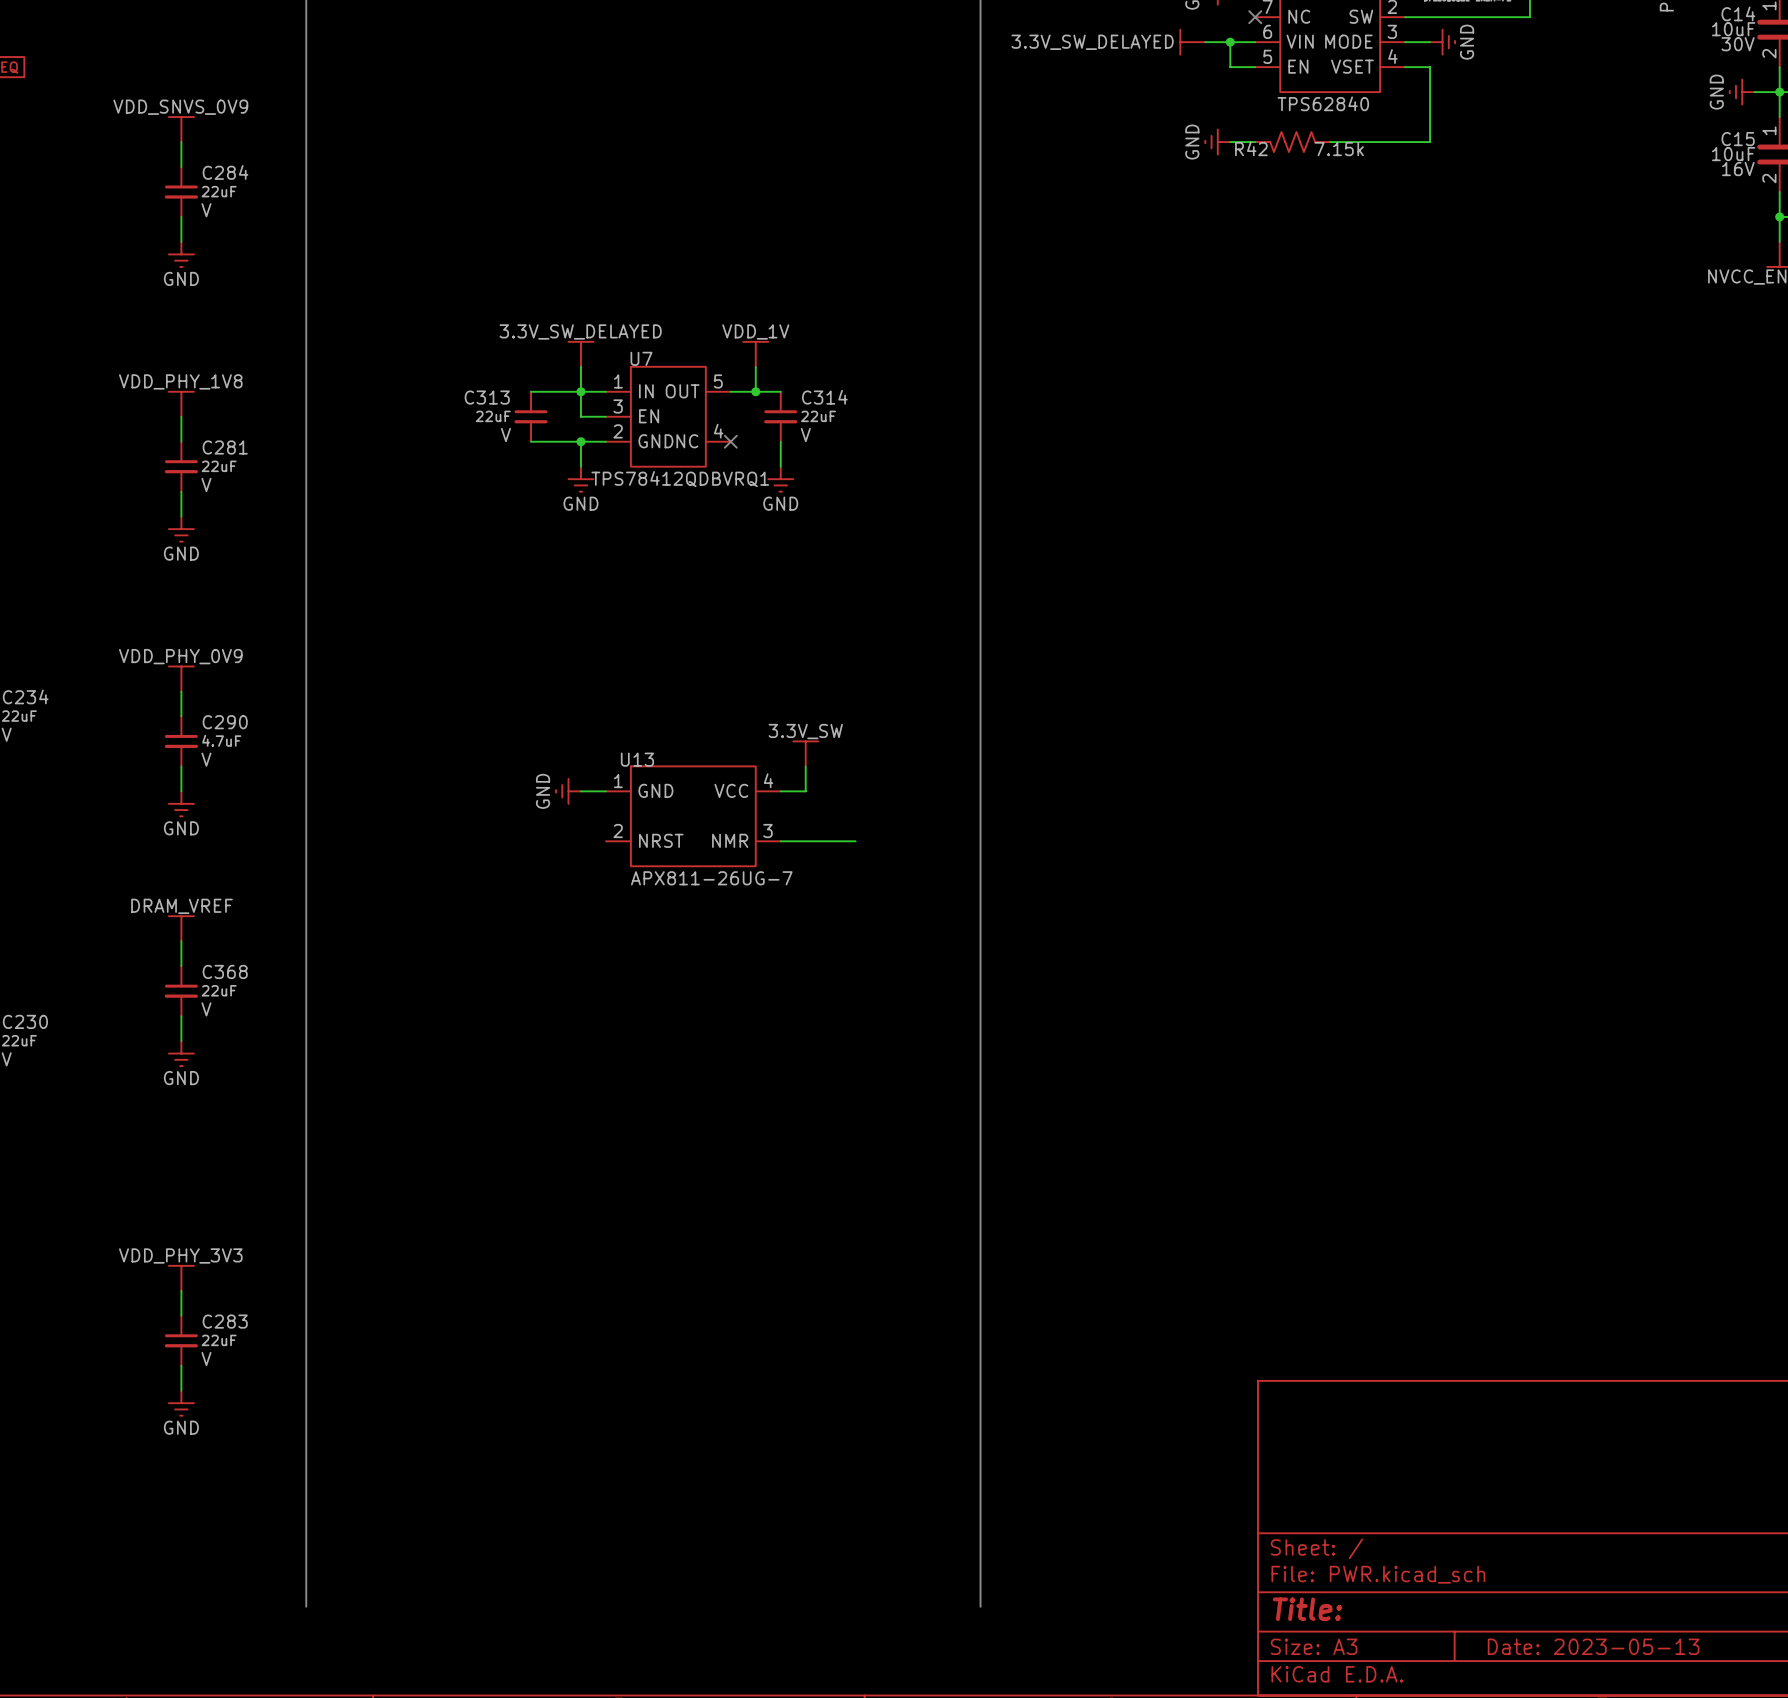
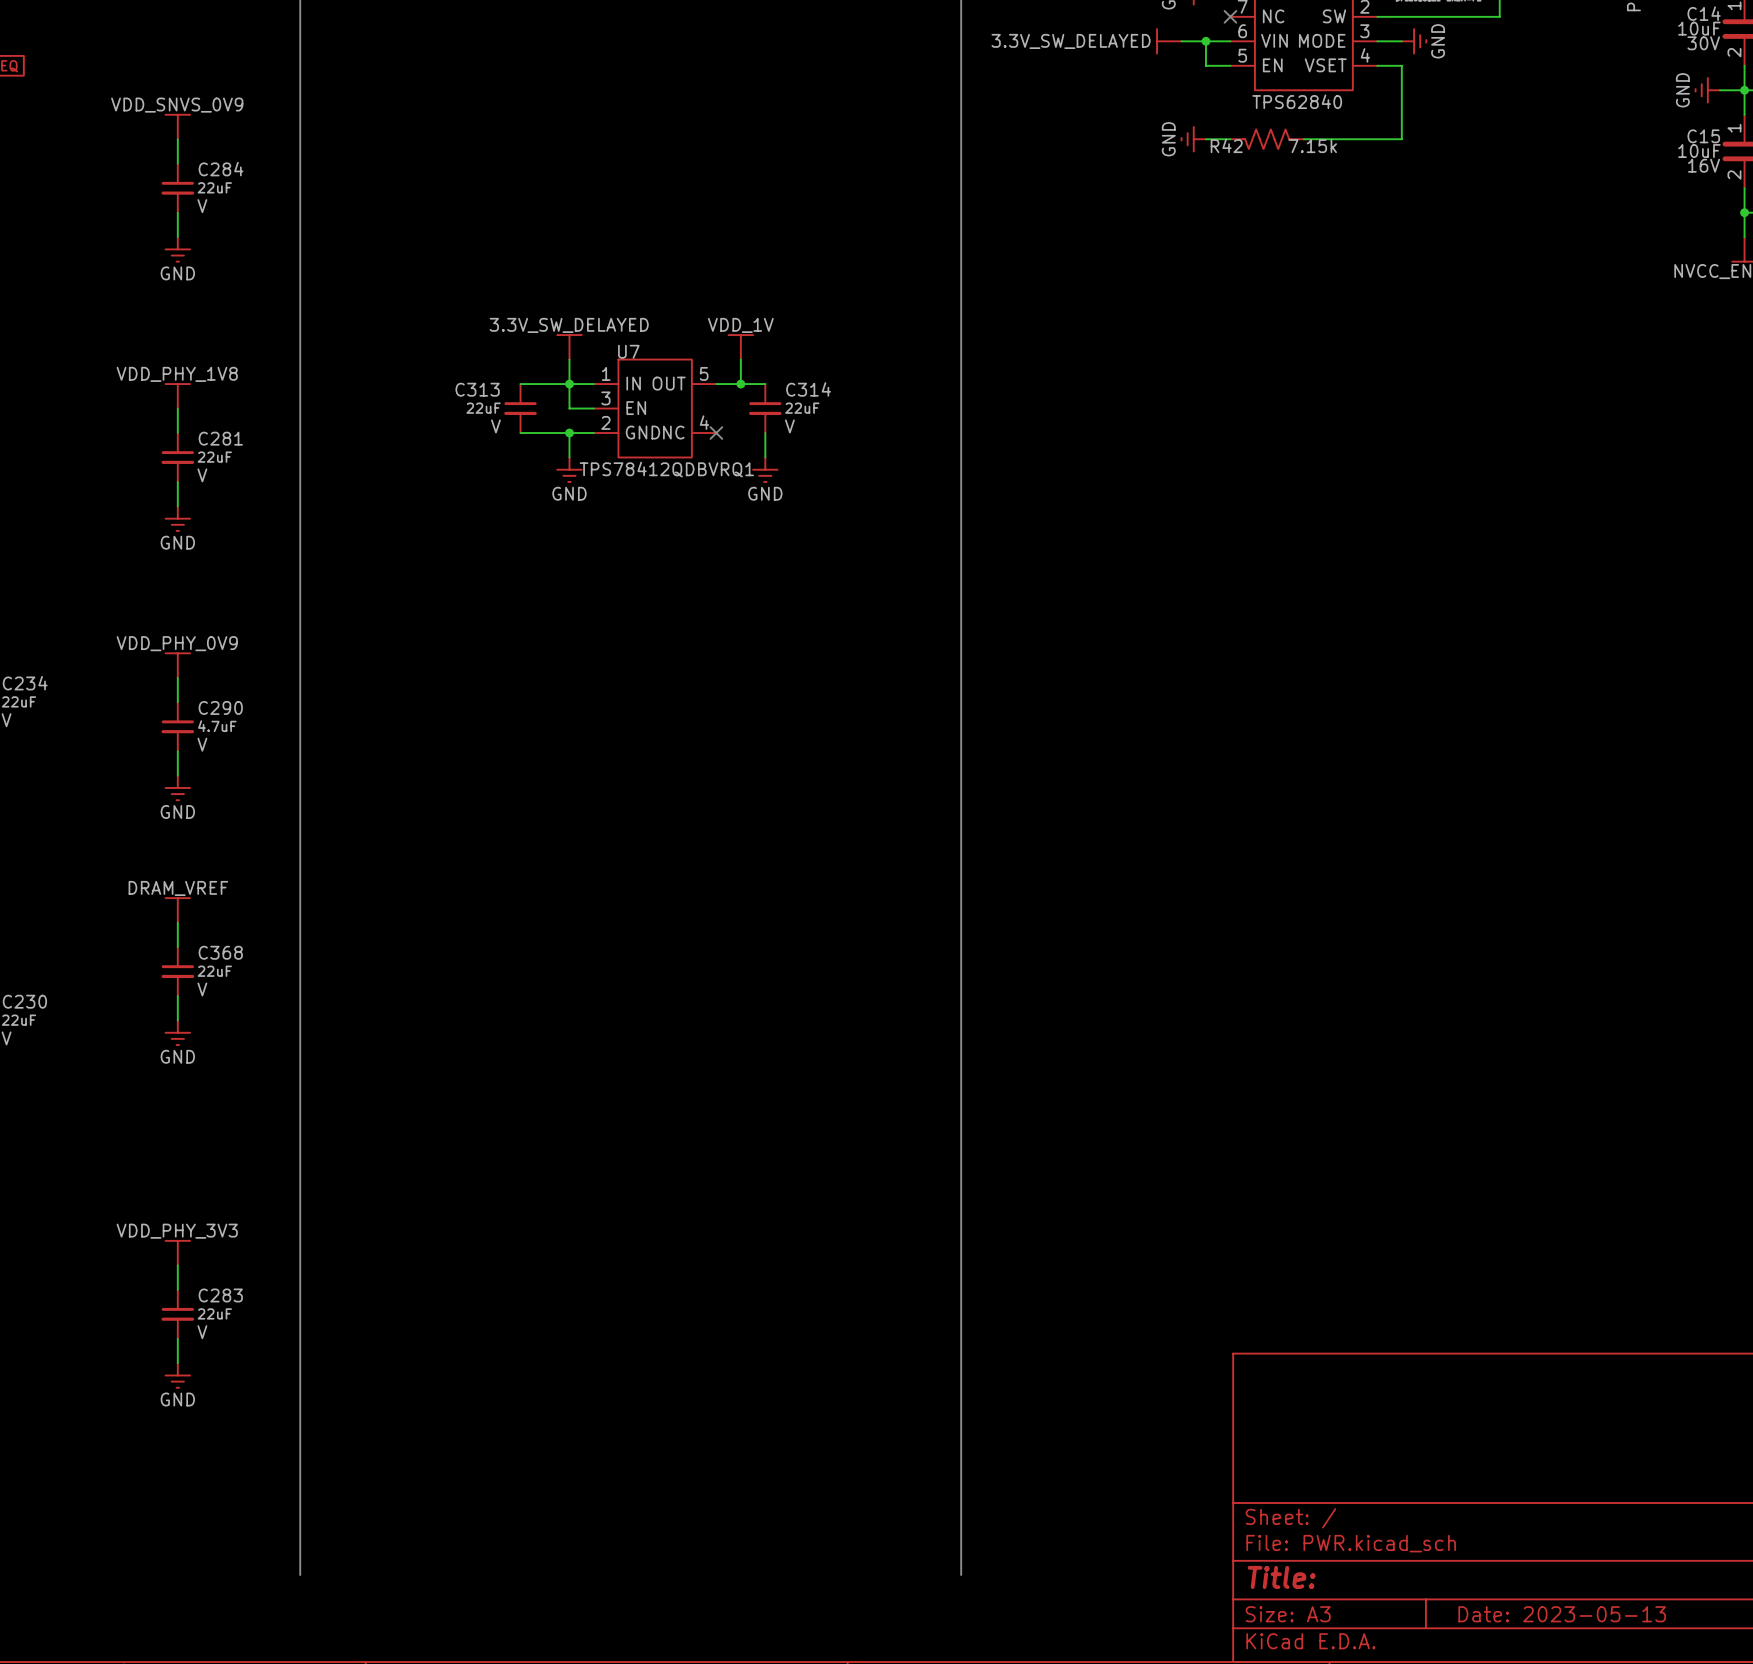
power symbol: 3.3V_SW (805, 753) -> none
wire: (805, 766) (805, 791) (780, 791) -> none
power symbol: GND (568, 791) -> none
wire: (580, 791) (605, 791) -> none
U13: APX811-26UG-7 (693, 816) -> none
wire: (780, 841) (855, 841) -> none

